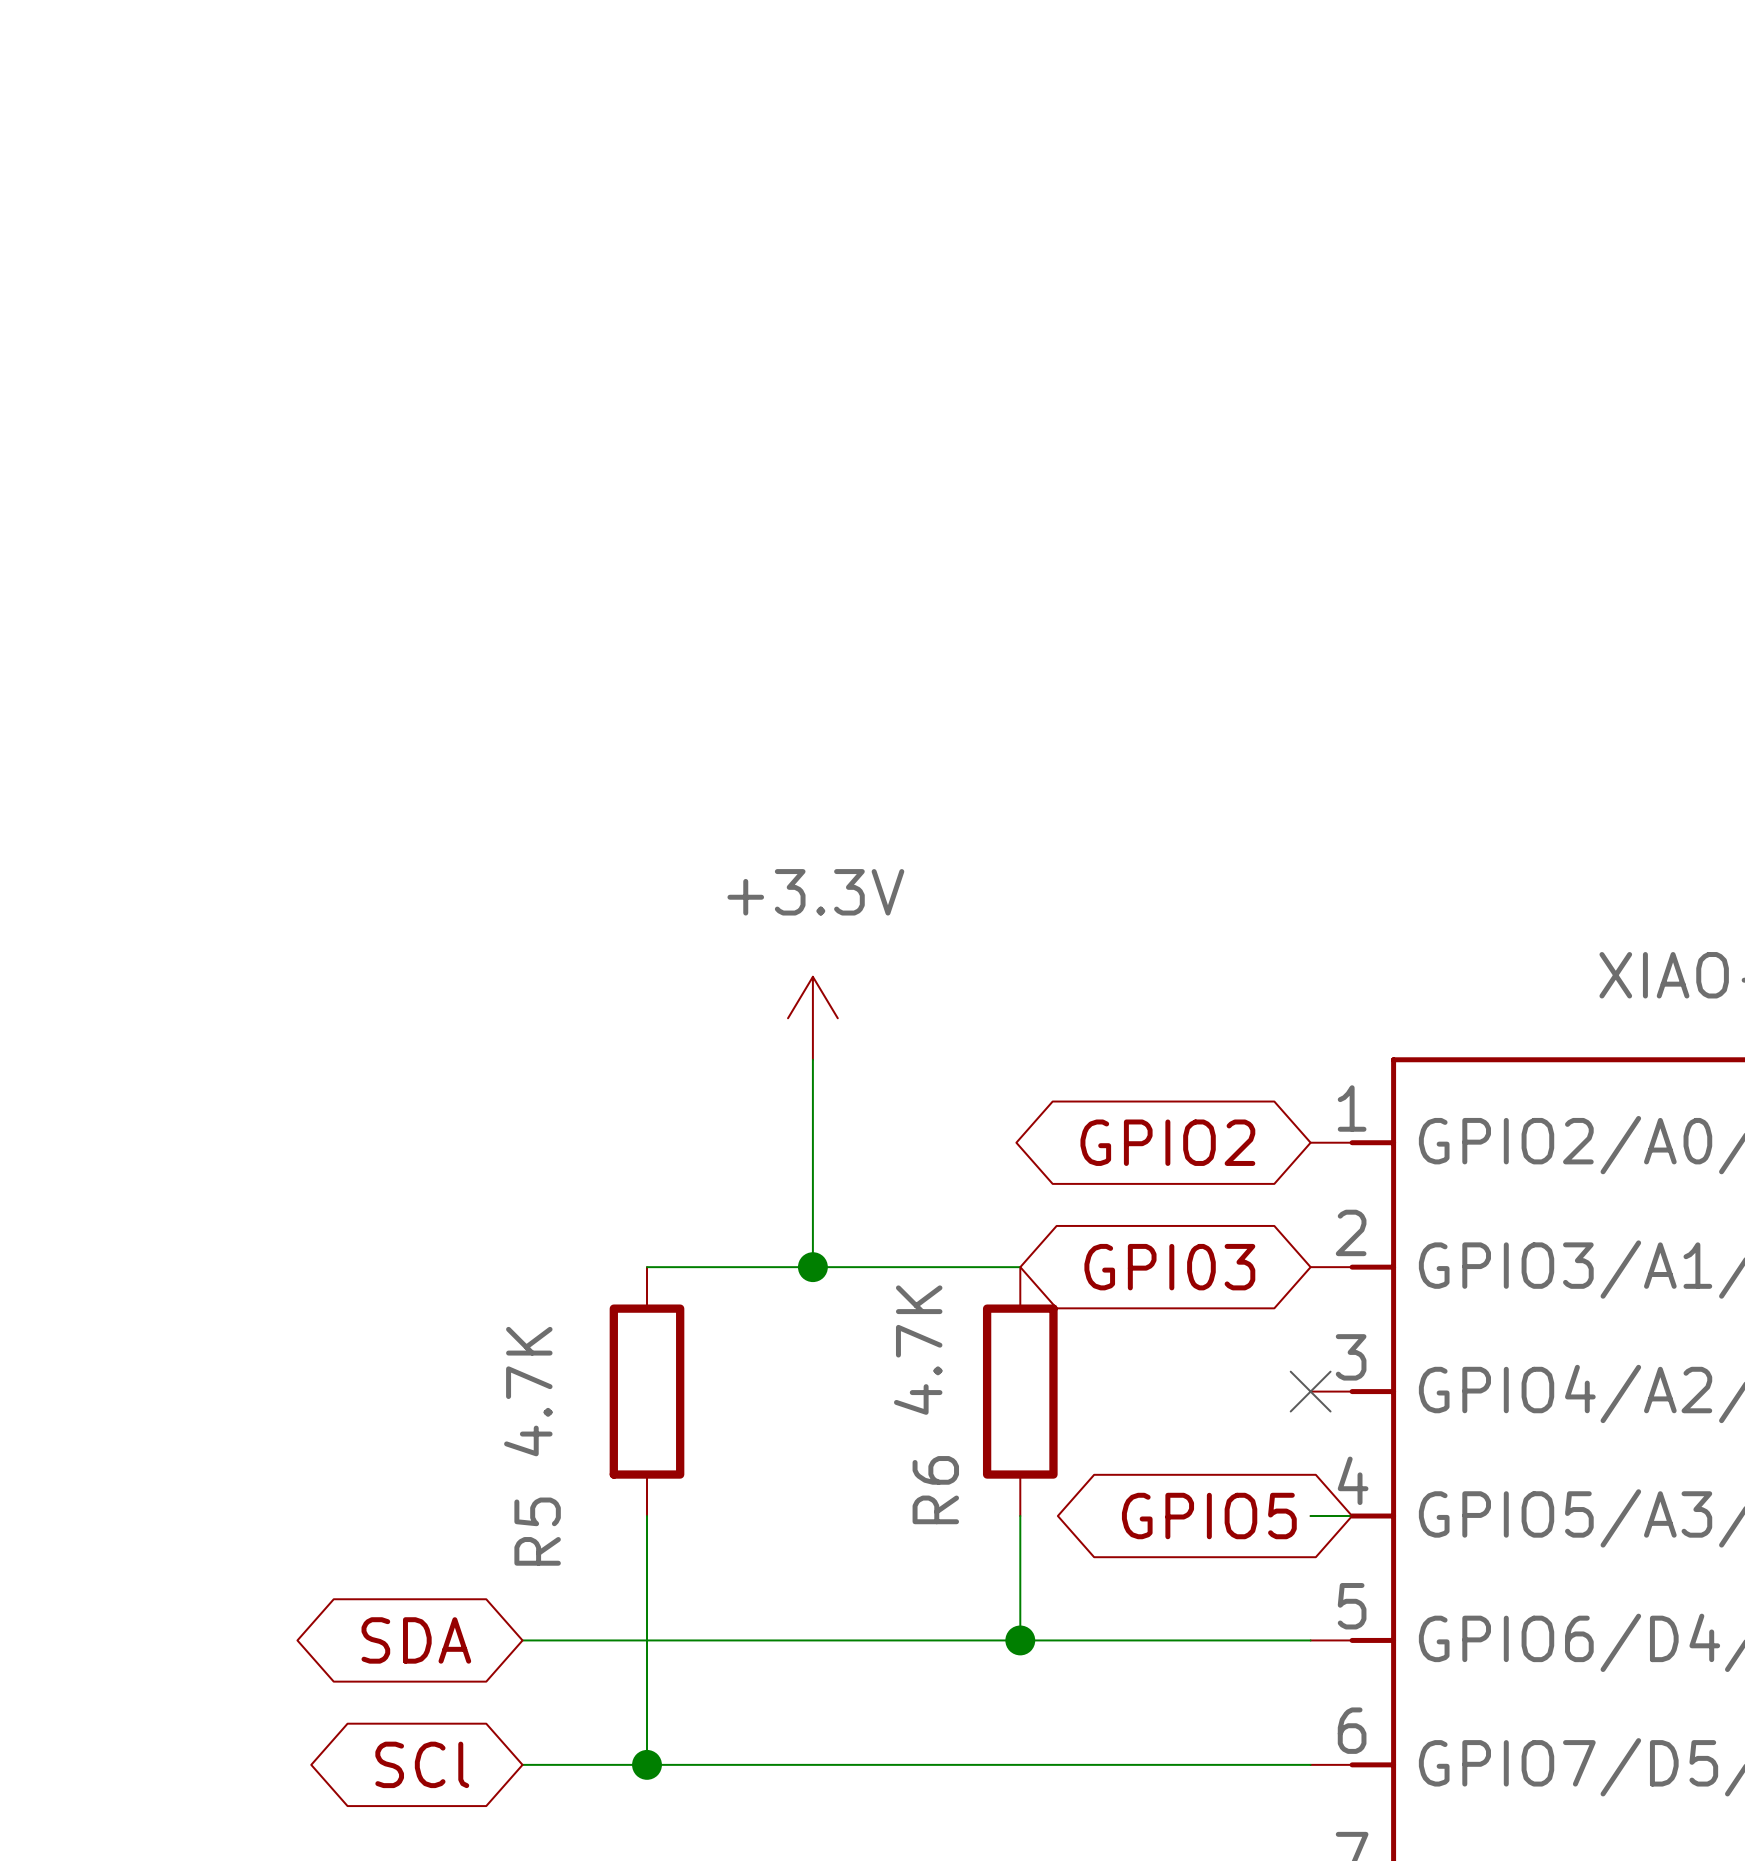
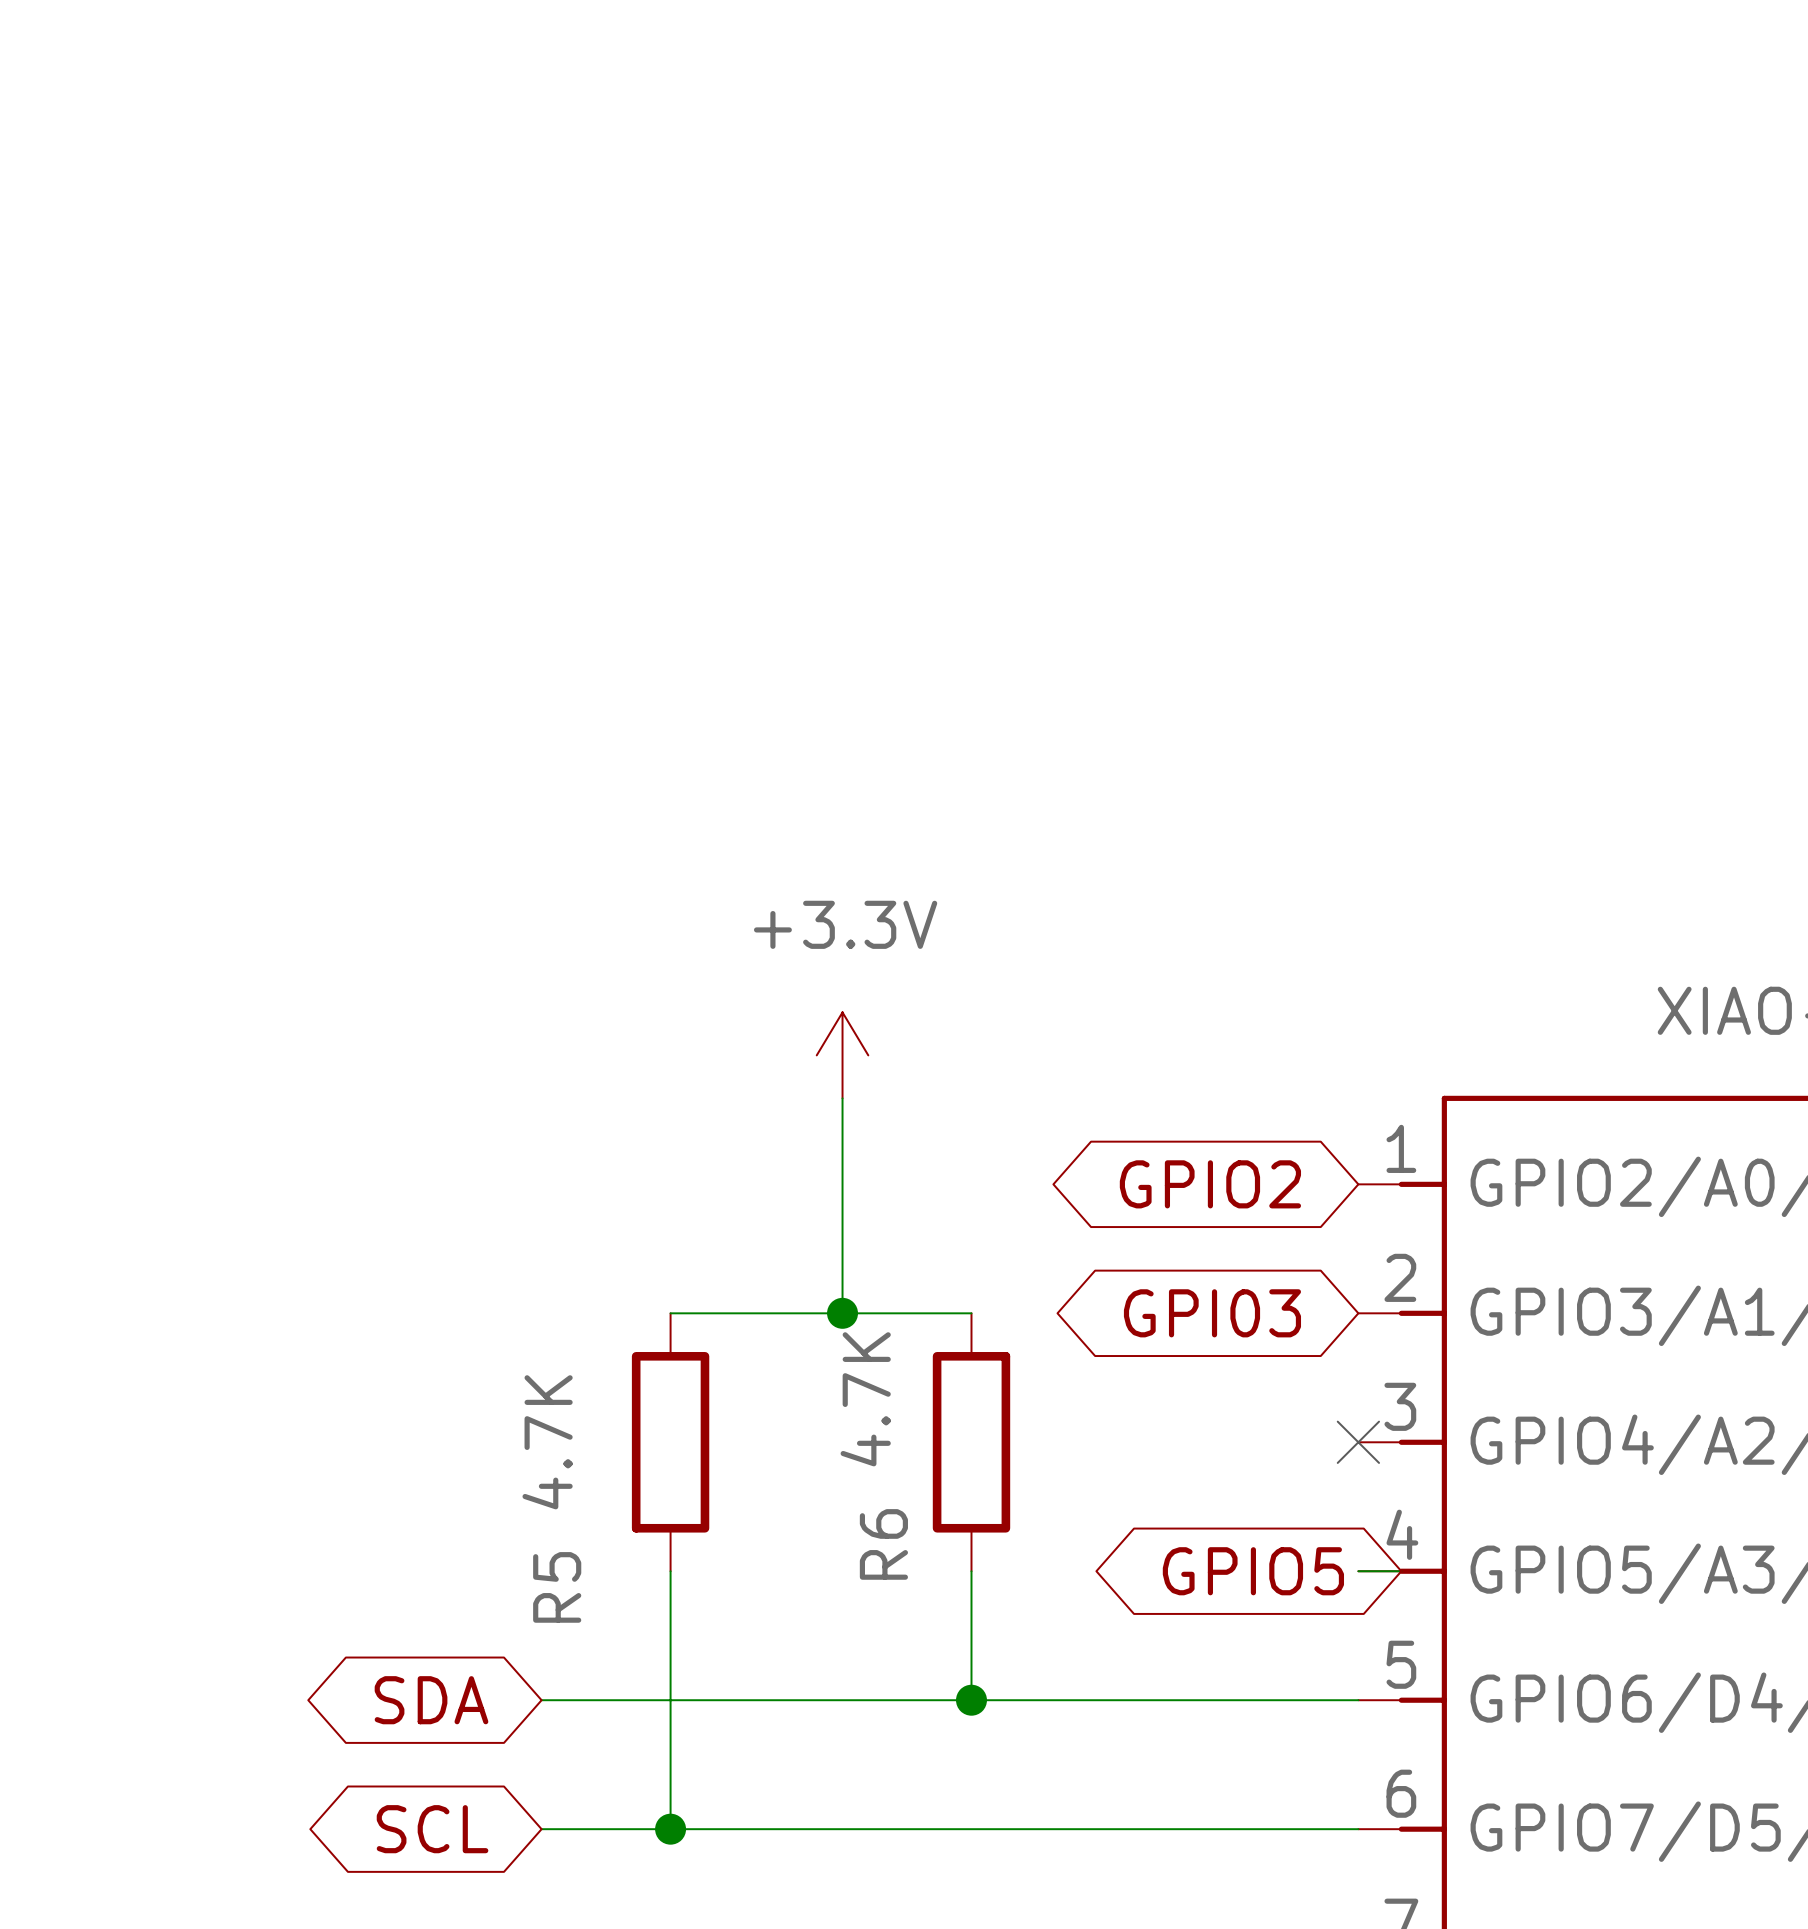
wire: (937, 1267) (1020, 1267) -> none
R6 position: (1020, 1391) -> (971, 1442)
wire: (1020, 1516) (1020, 1640) -> (971, 1571) (971, 1700)
junction position: (1020, 1640) -> (971, 1700)
global label: SCl (422, 1764) -> SCL (432, 1829)

